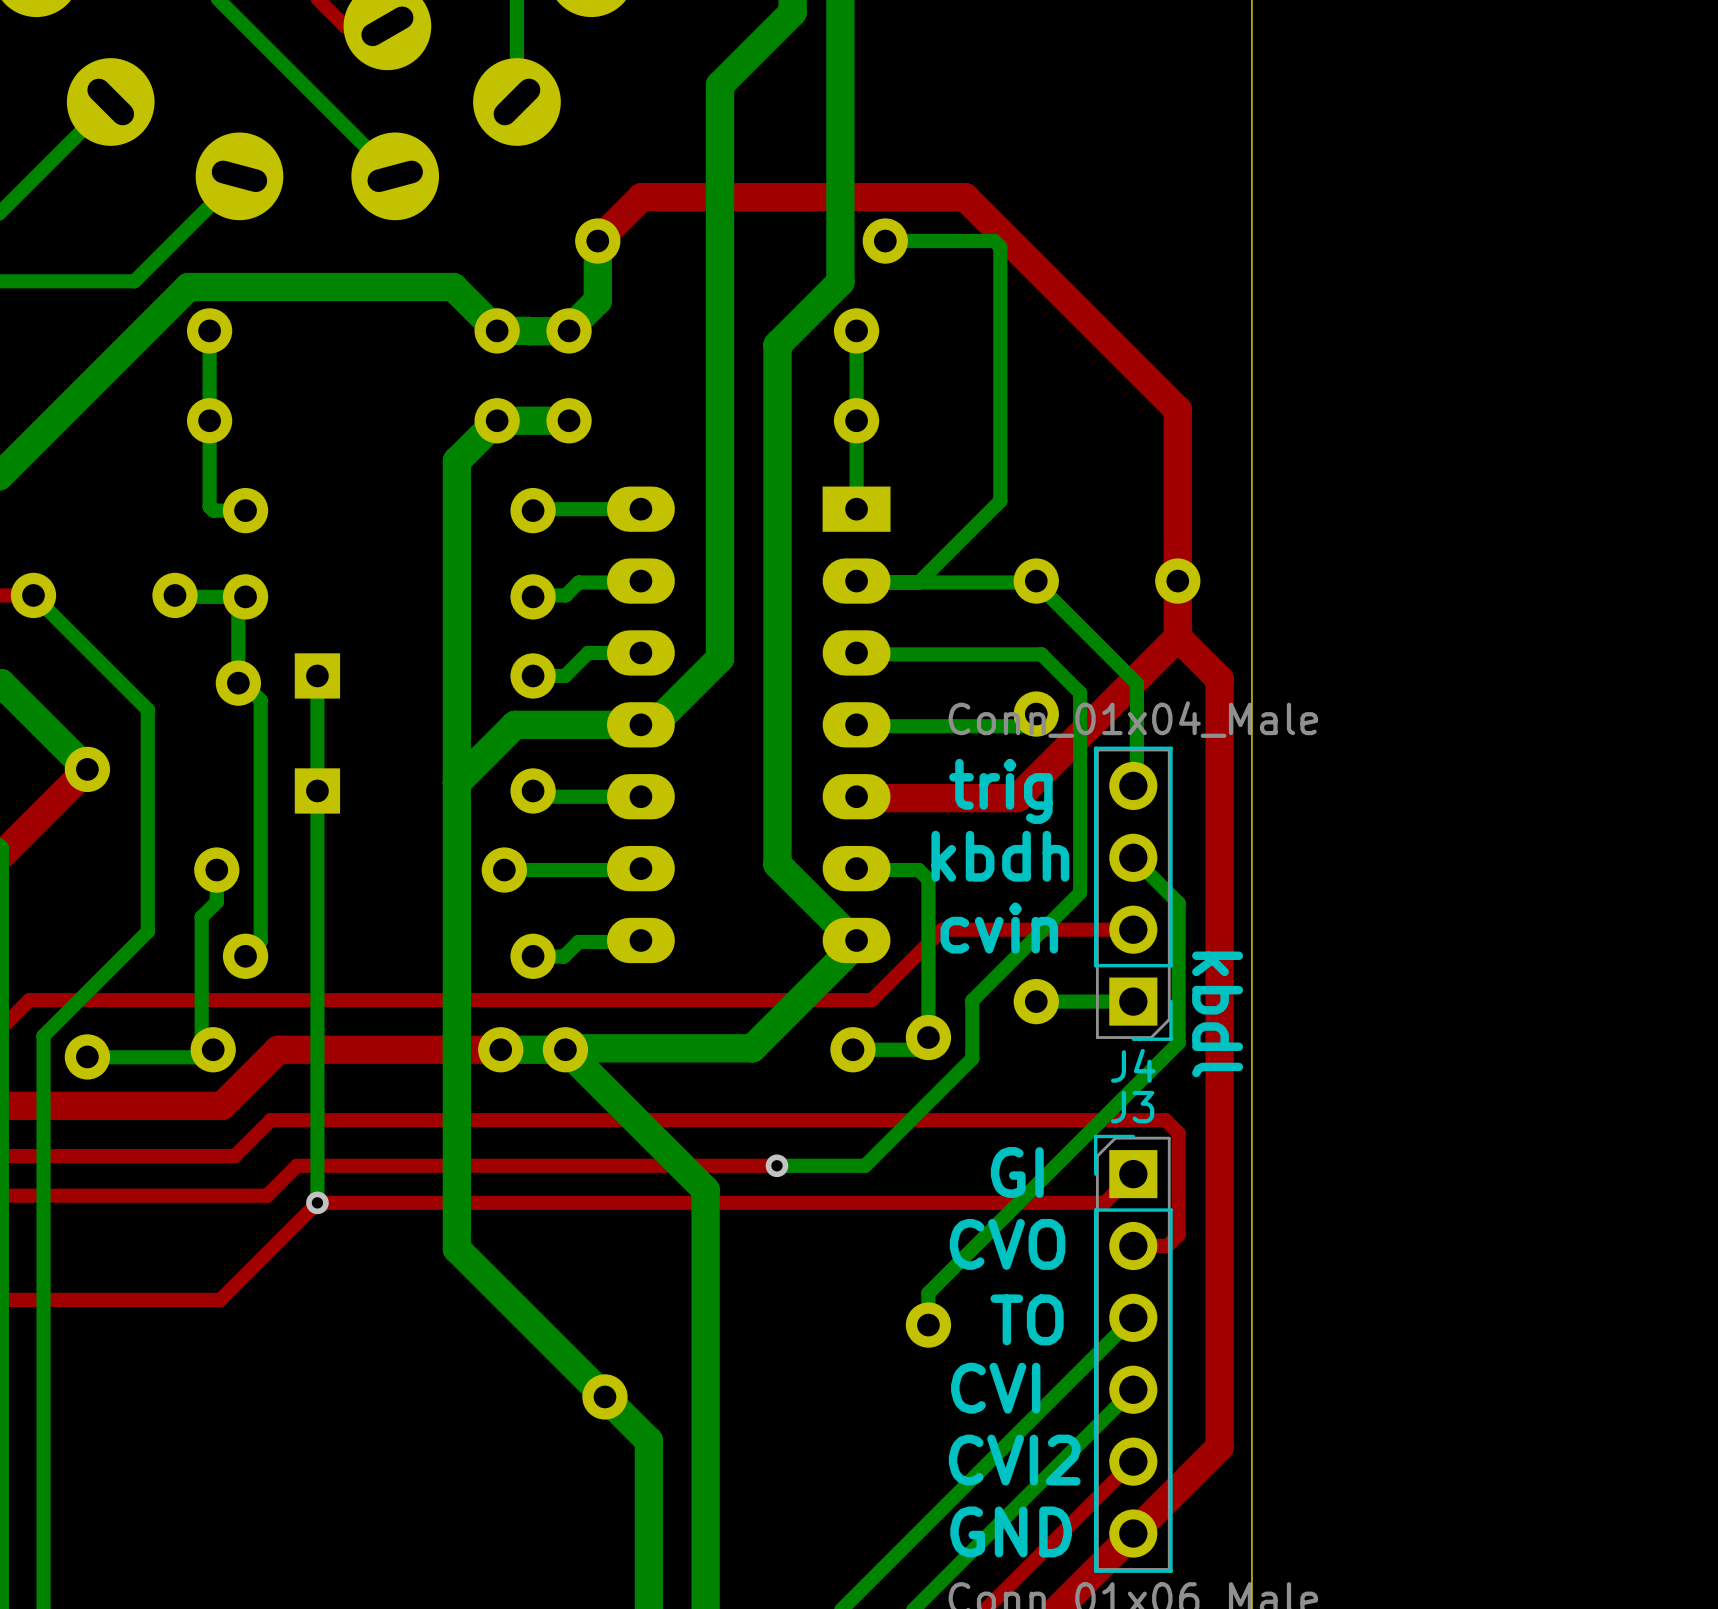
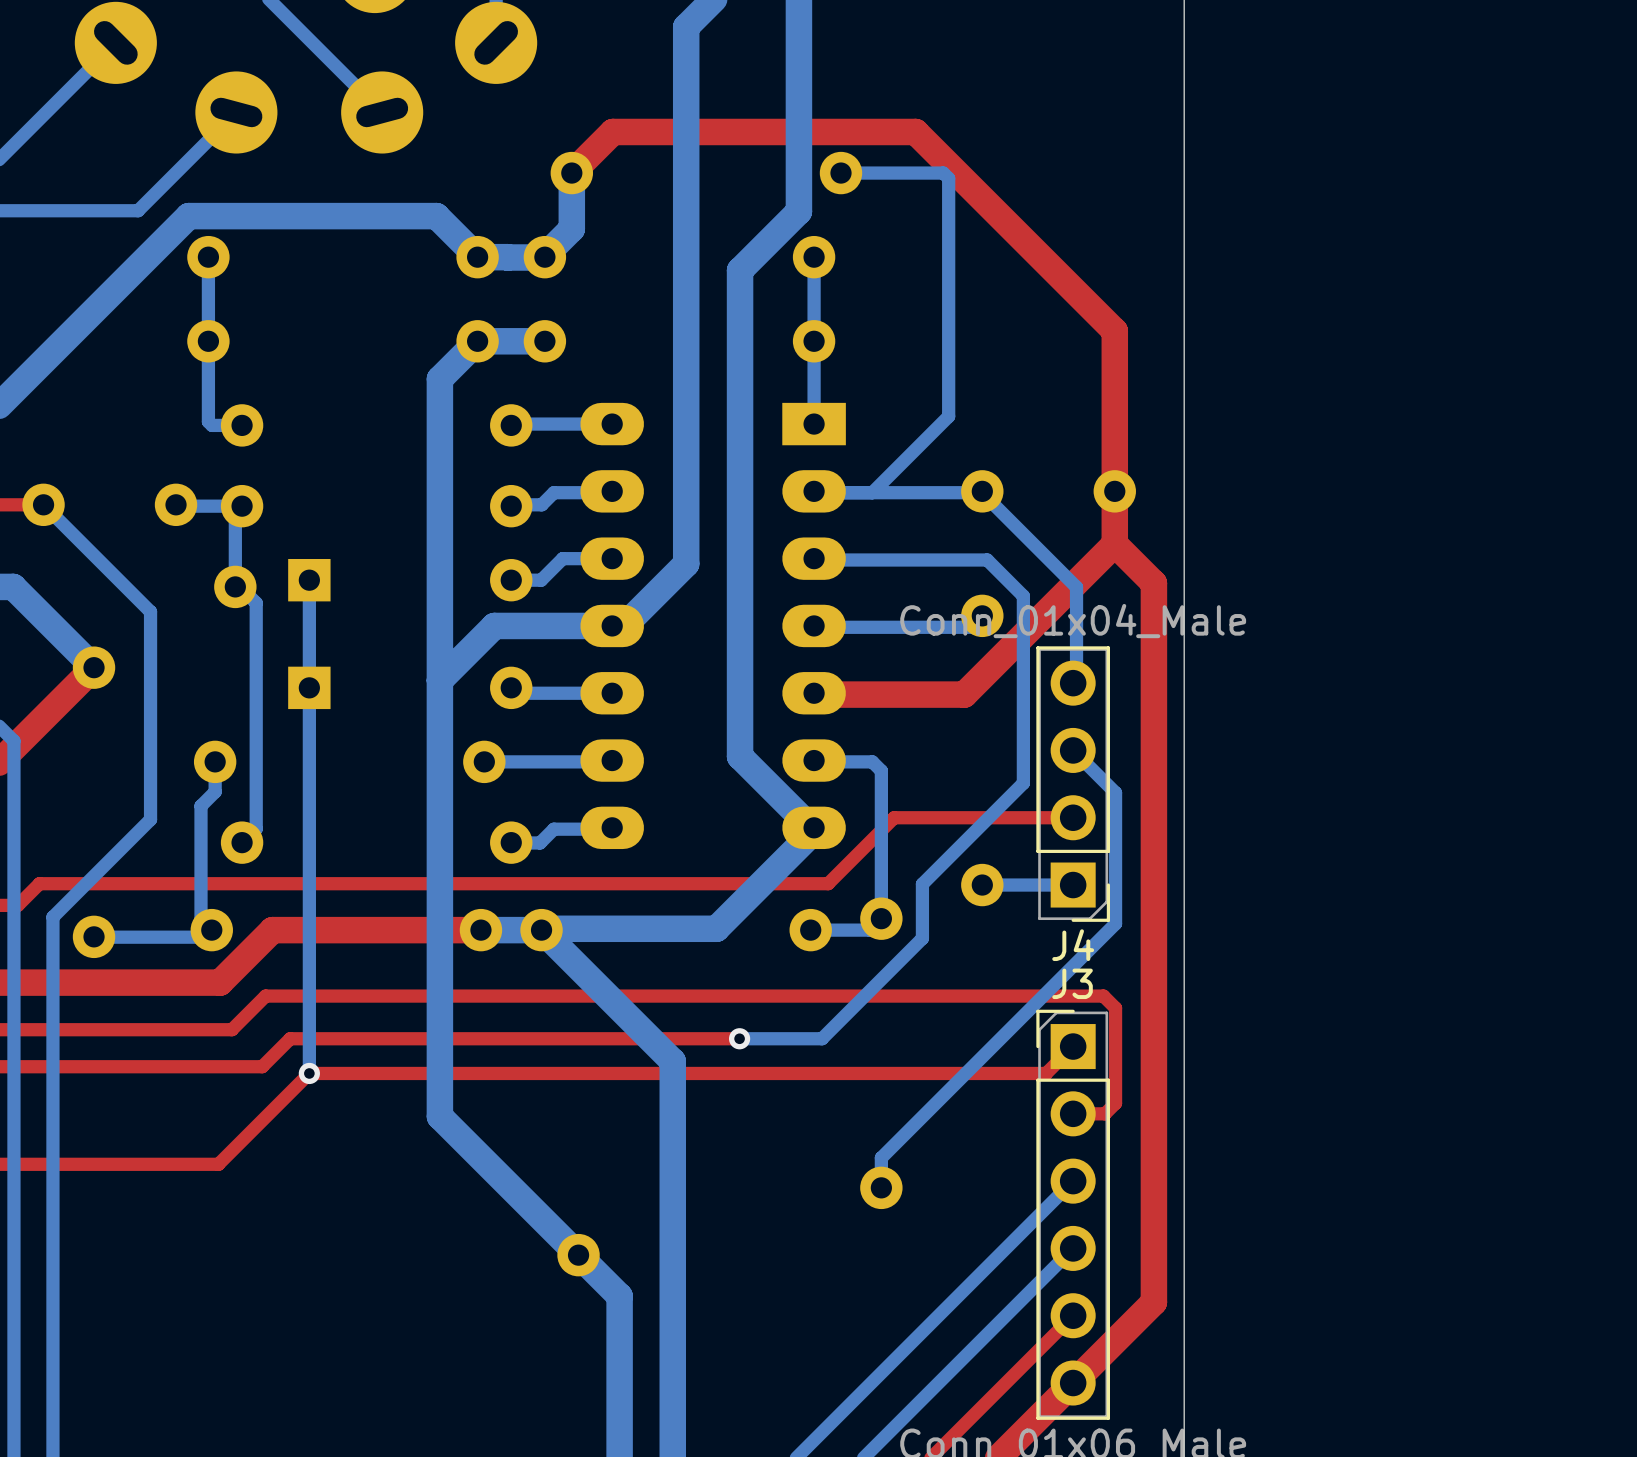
text: trig (1000, 791) -> none
text: kbdh (1000, 856) -> none
text: cvin (999, 928) -> none
text: kbdl (1217, 1014) -> none
text: GI (1017, 1172) -> none
text: CVO (1007, 1244) -> none
text: TO (1027, 1319) -> none
text: CVI (995, 1388) -> none
text: CVI2 (1014, 1460) -> none
text: GND (1011, 1531) -> none

